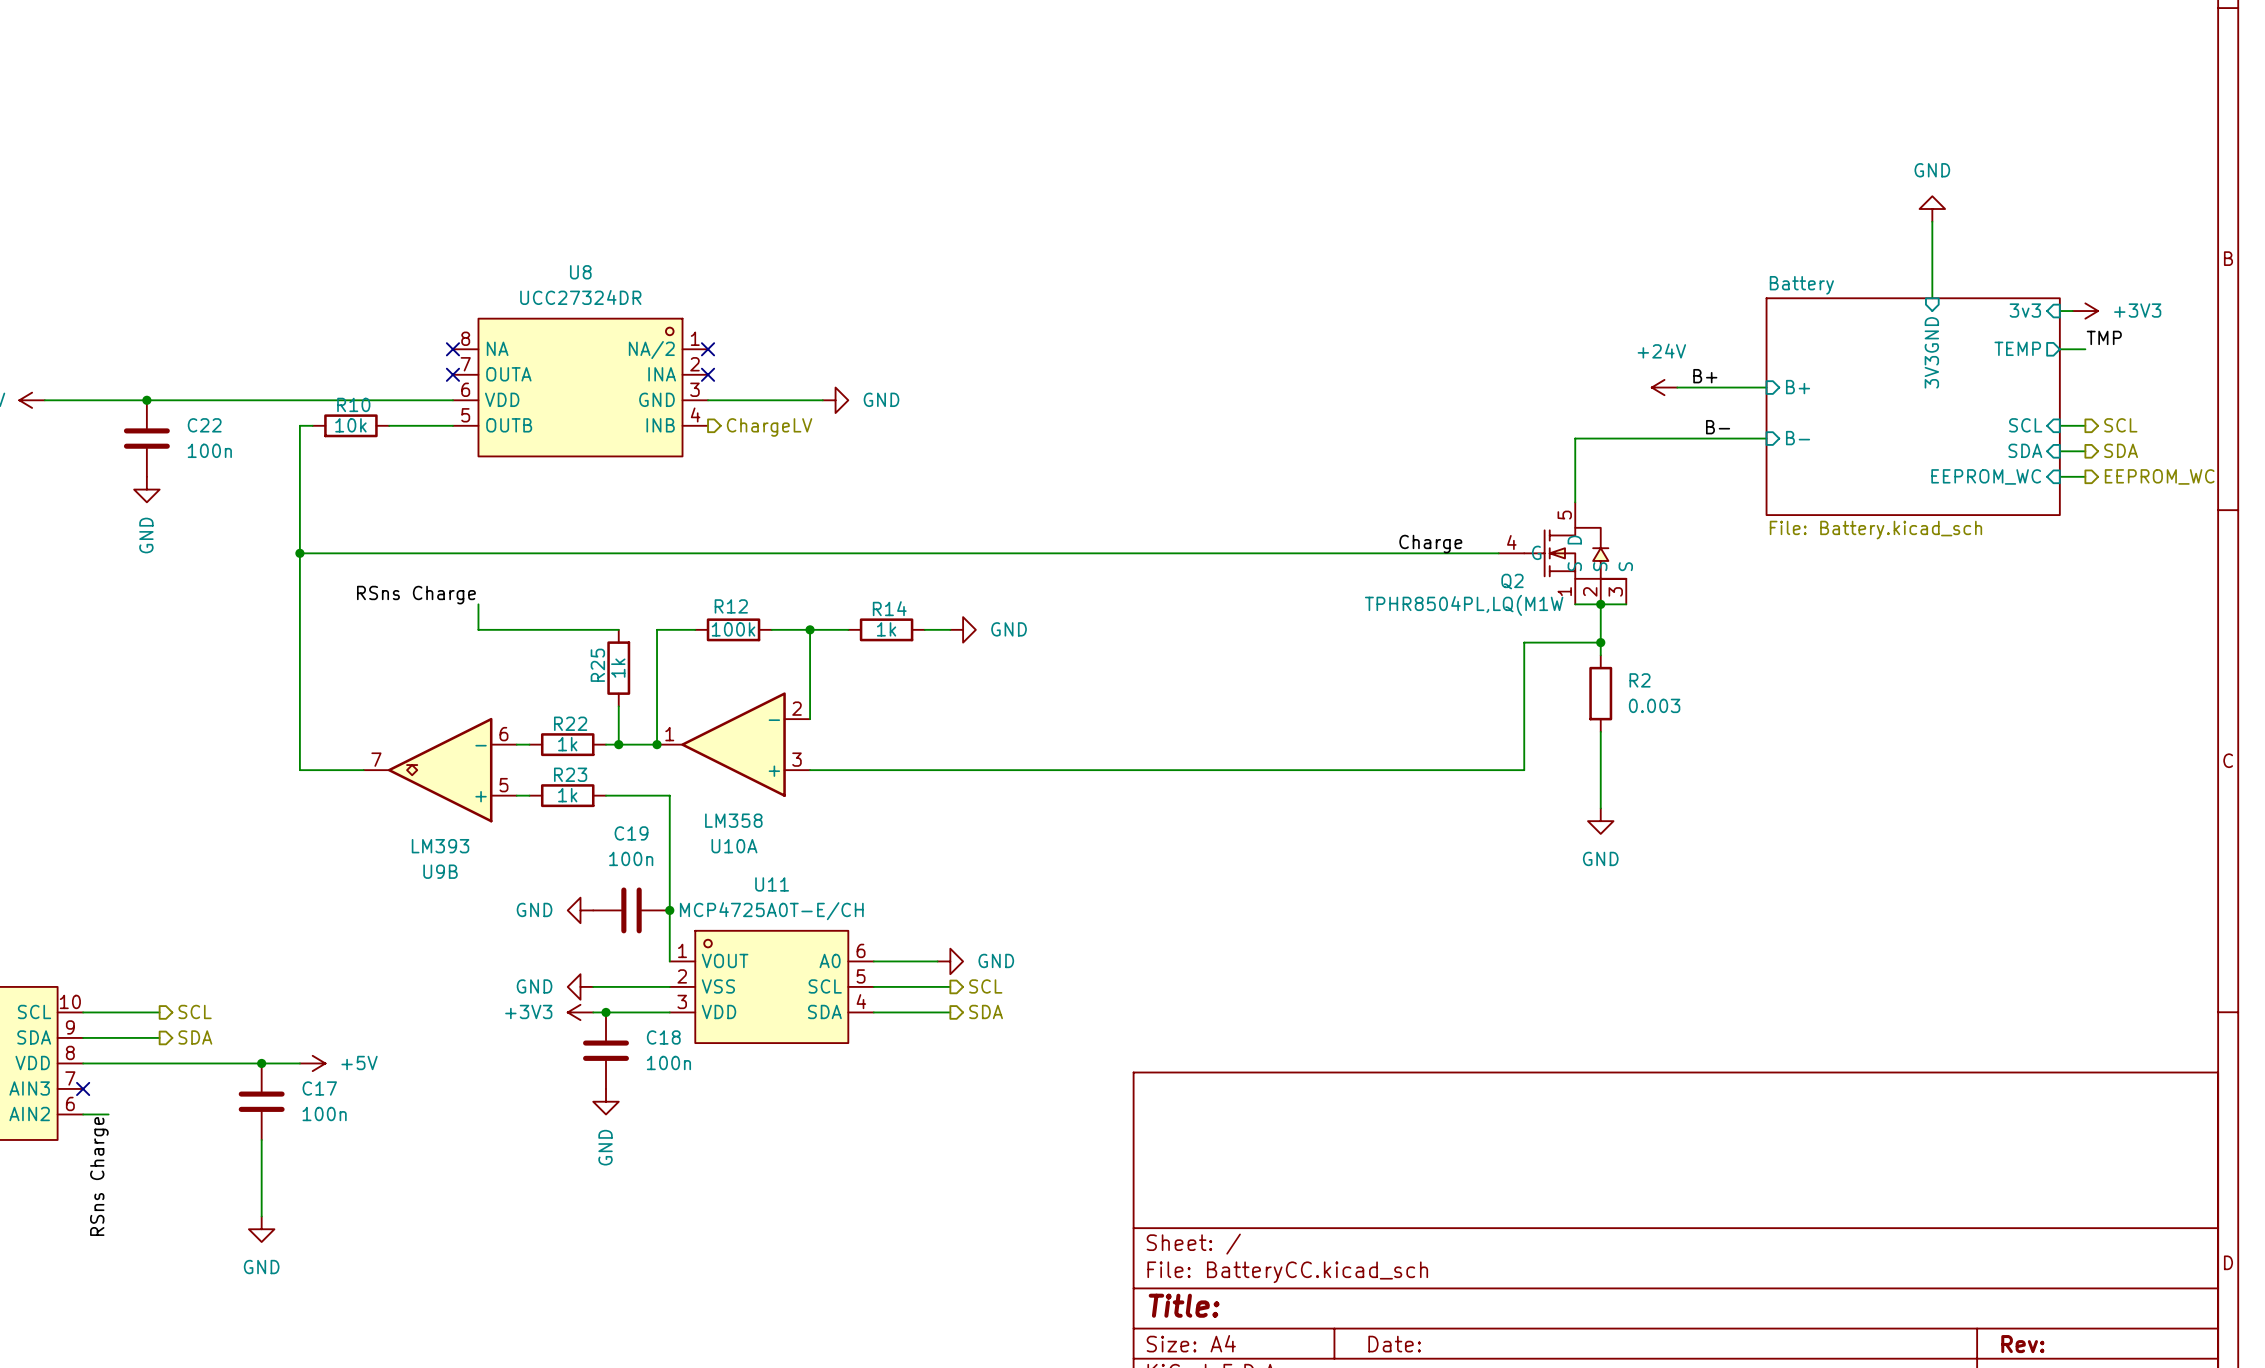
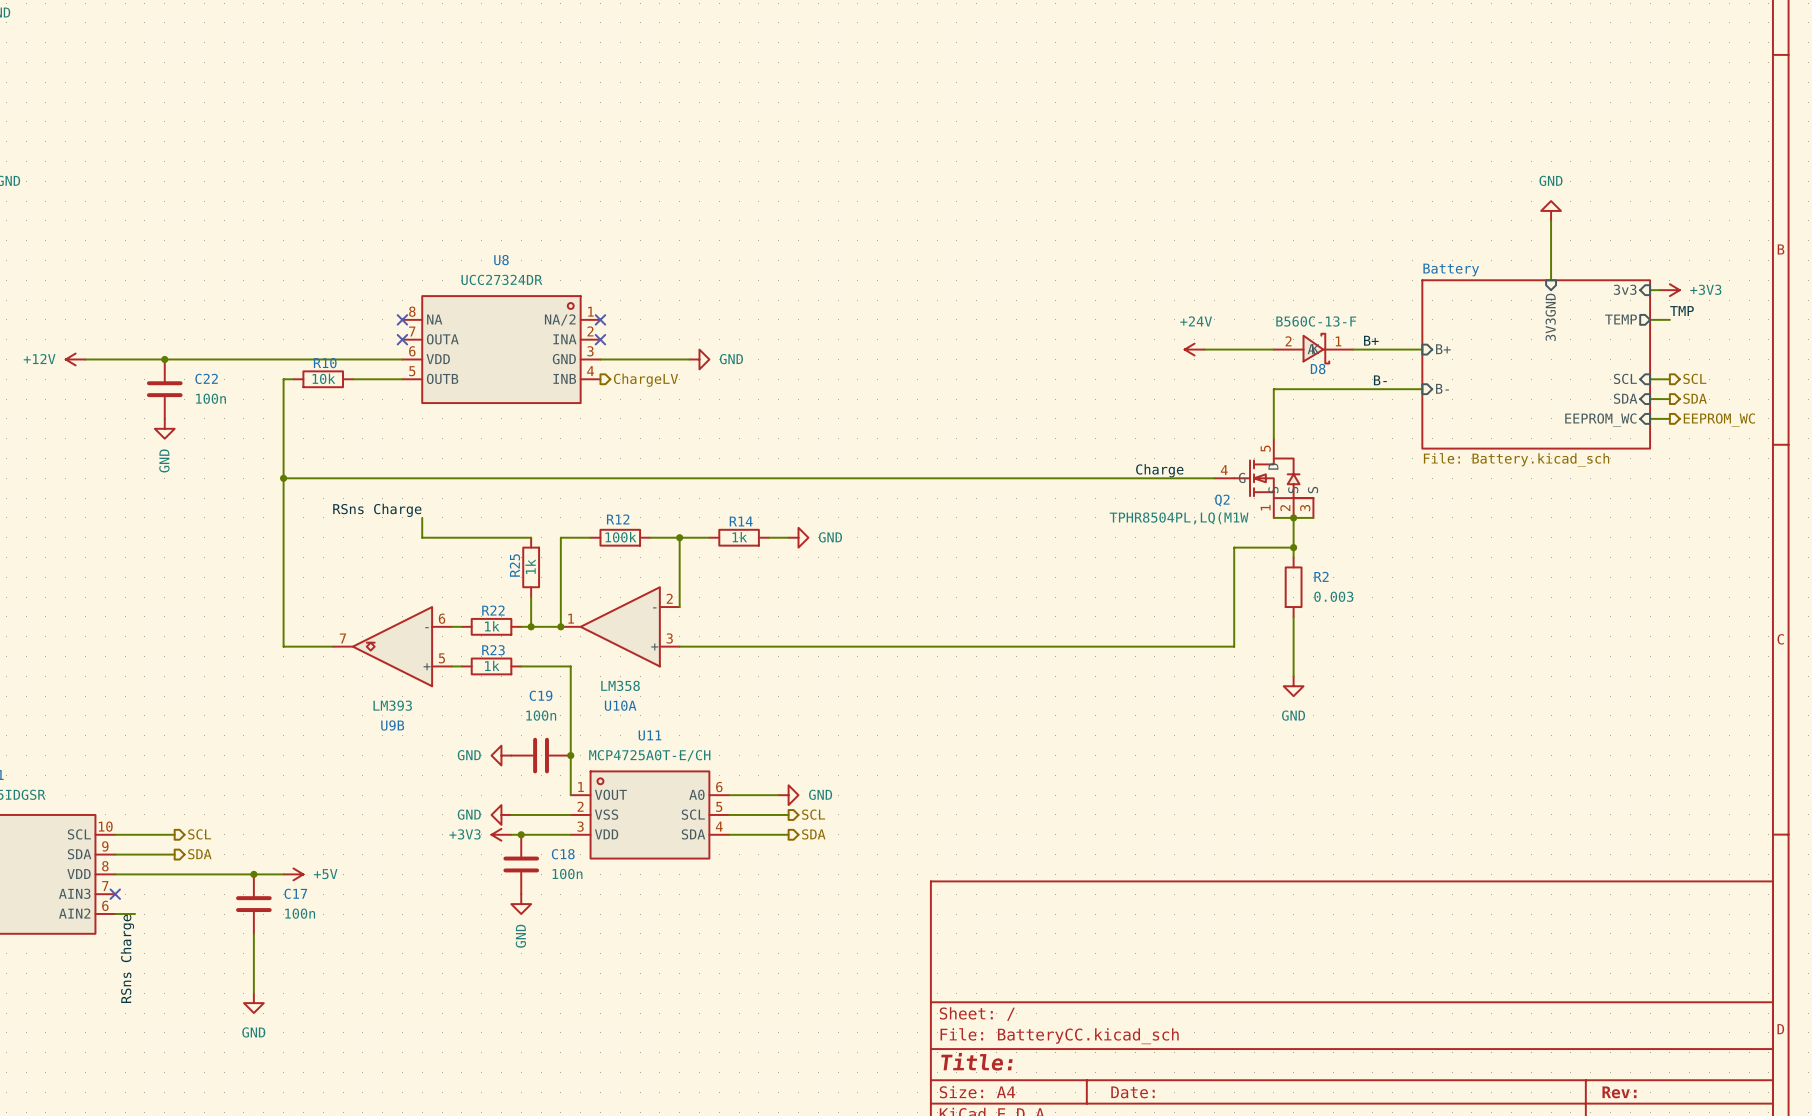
D8: none -> B560C-13-F (1313, 348)
wire: none -> (1204, 349) (1273, 349)
power symbol position: +24V (1664, 387) -> +24V (1194, 349)

